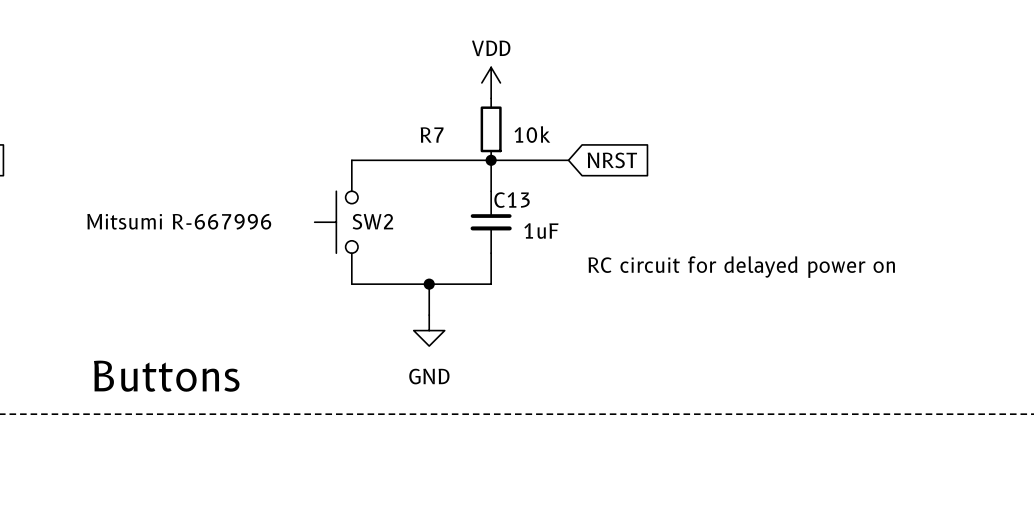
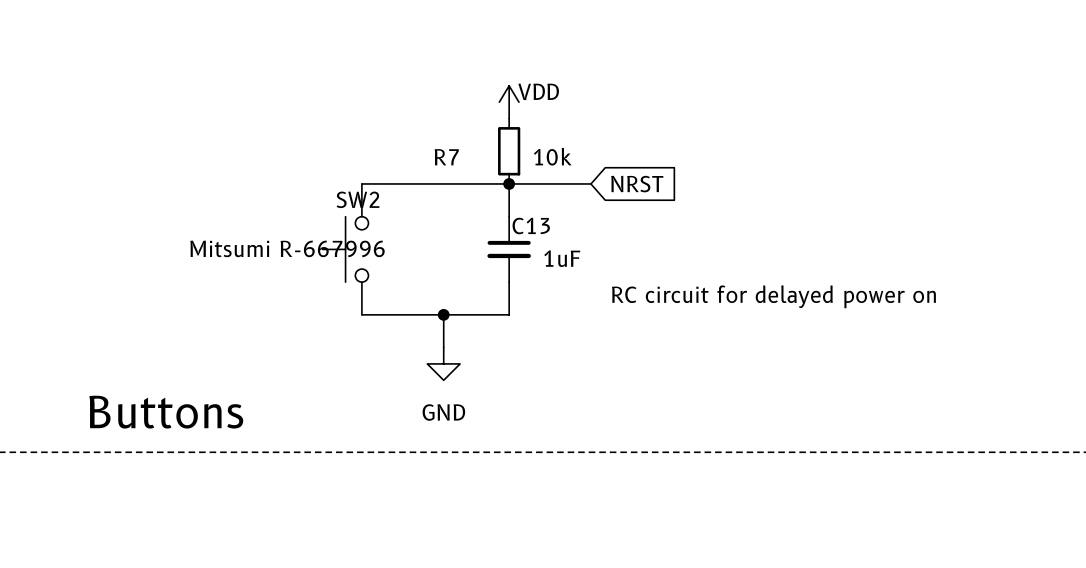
power symbol text position: VDD (491, 48) -> VDD (538, 91)
SW2 value position: Mitsumi R-667996 (179, 221) -> Mitsumi R-667996 (287, 248)
SW2 name position: SW2 (372, 221) -> SW2 (358, 199)

